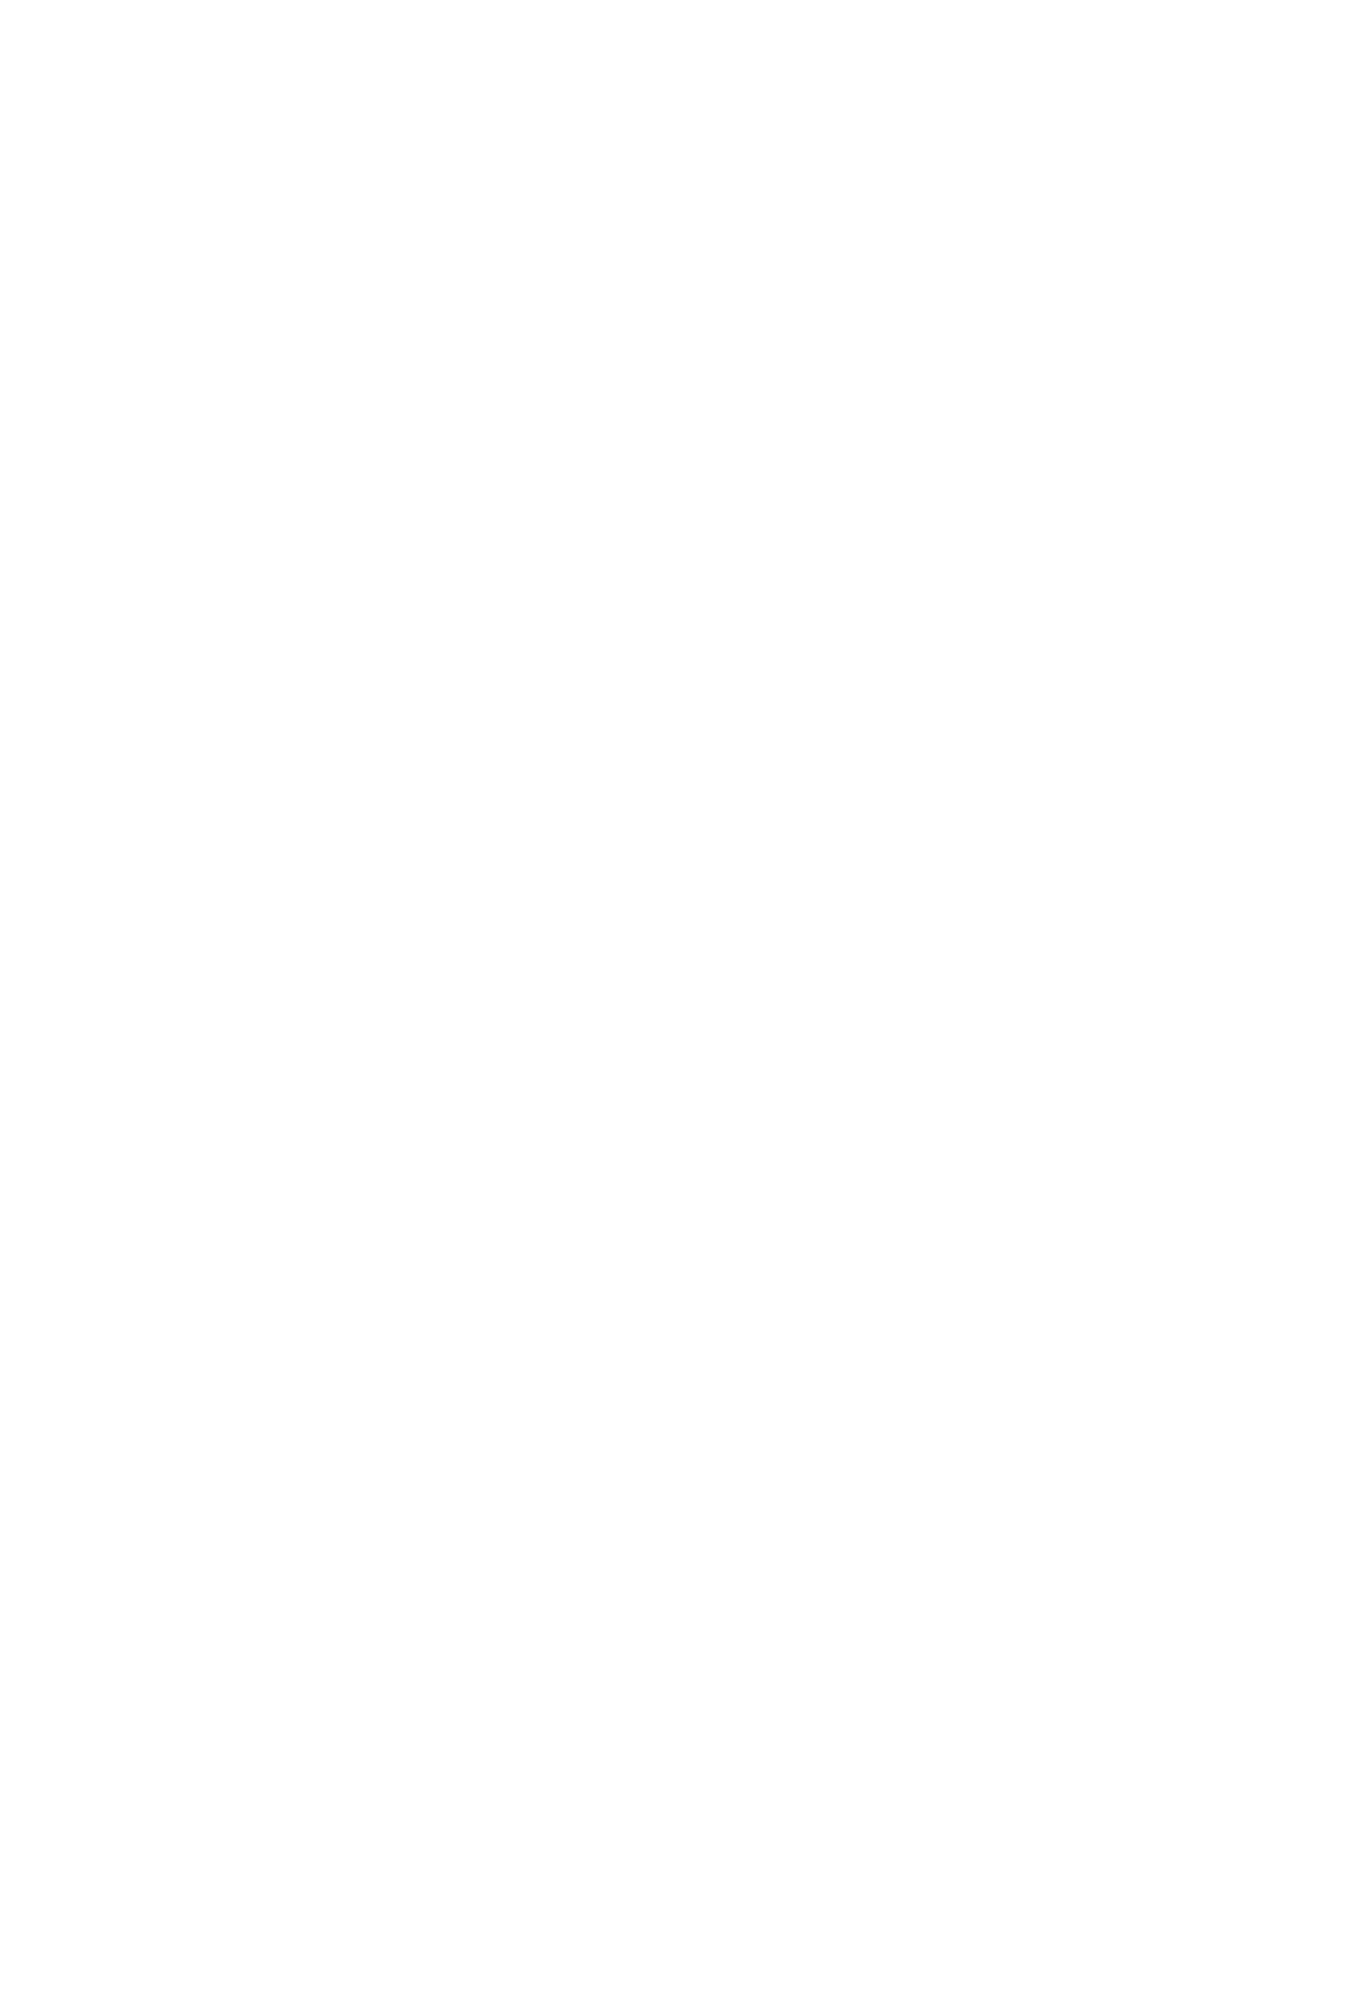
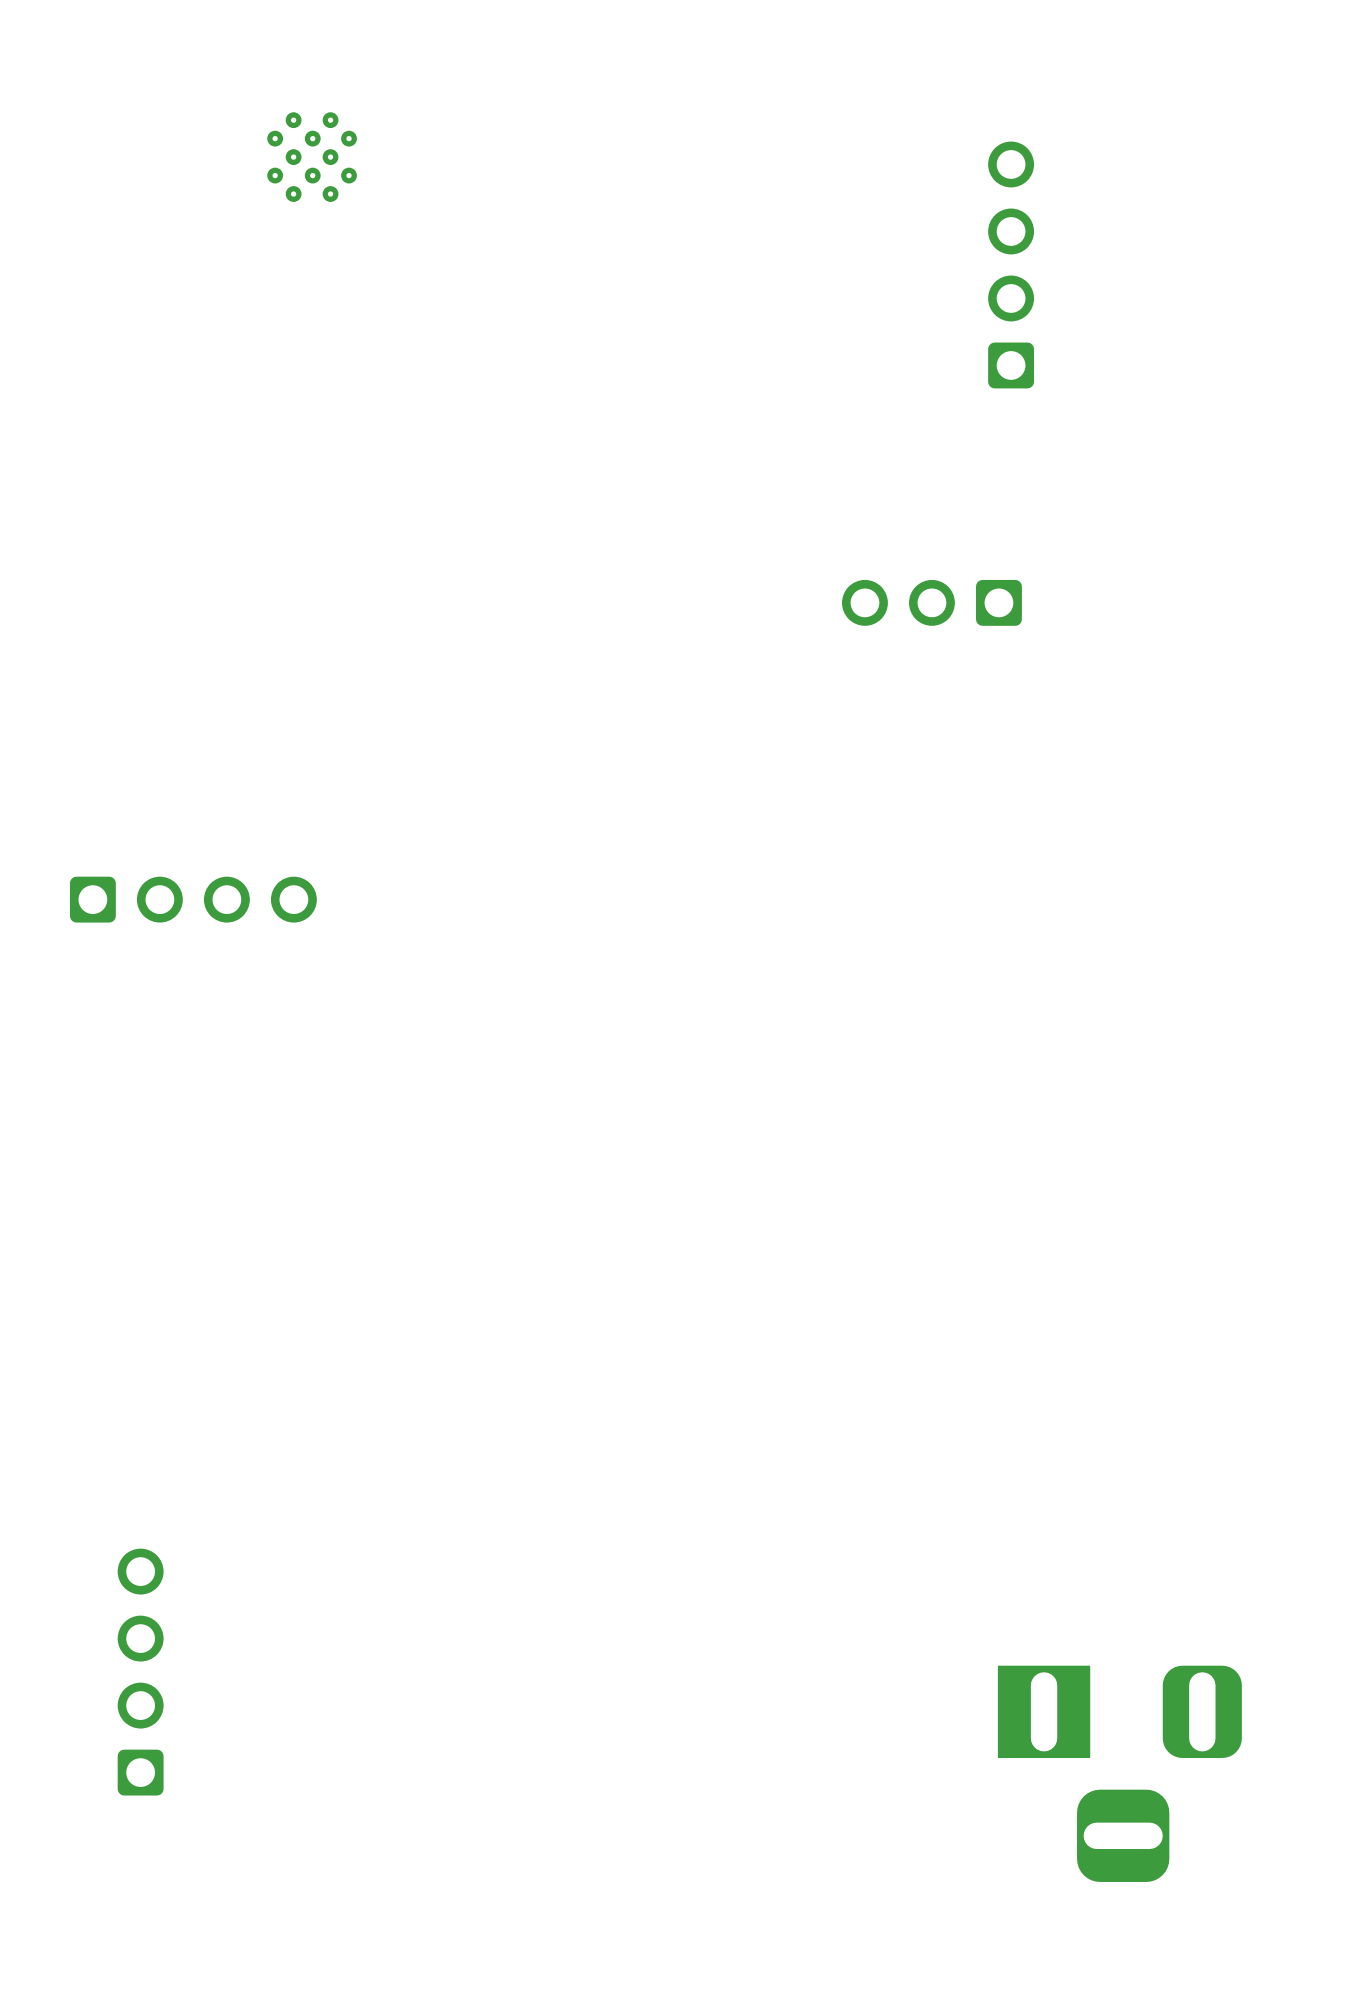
part: none -> (312, 157)
part: none -> (1011, 264)
part: none -> (931, 602)
part: none -> (193, 899)
part: none -> (140, 1672)
part: none -> (1119, 1773)

